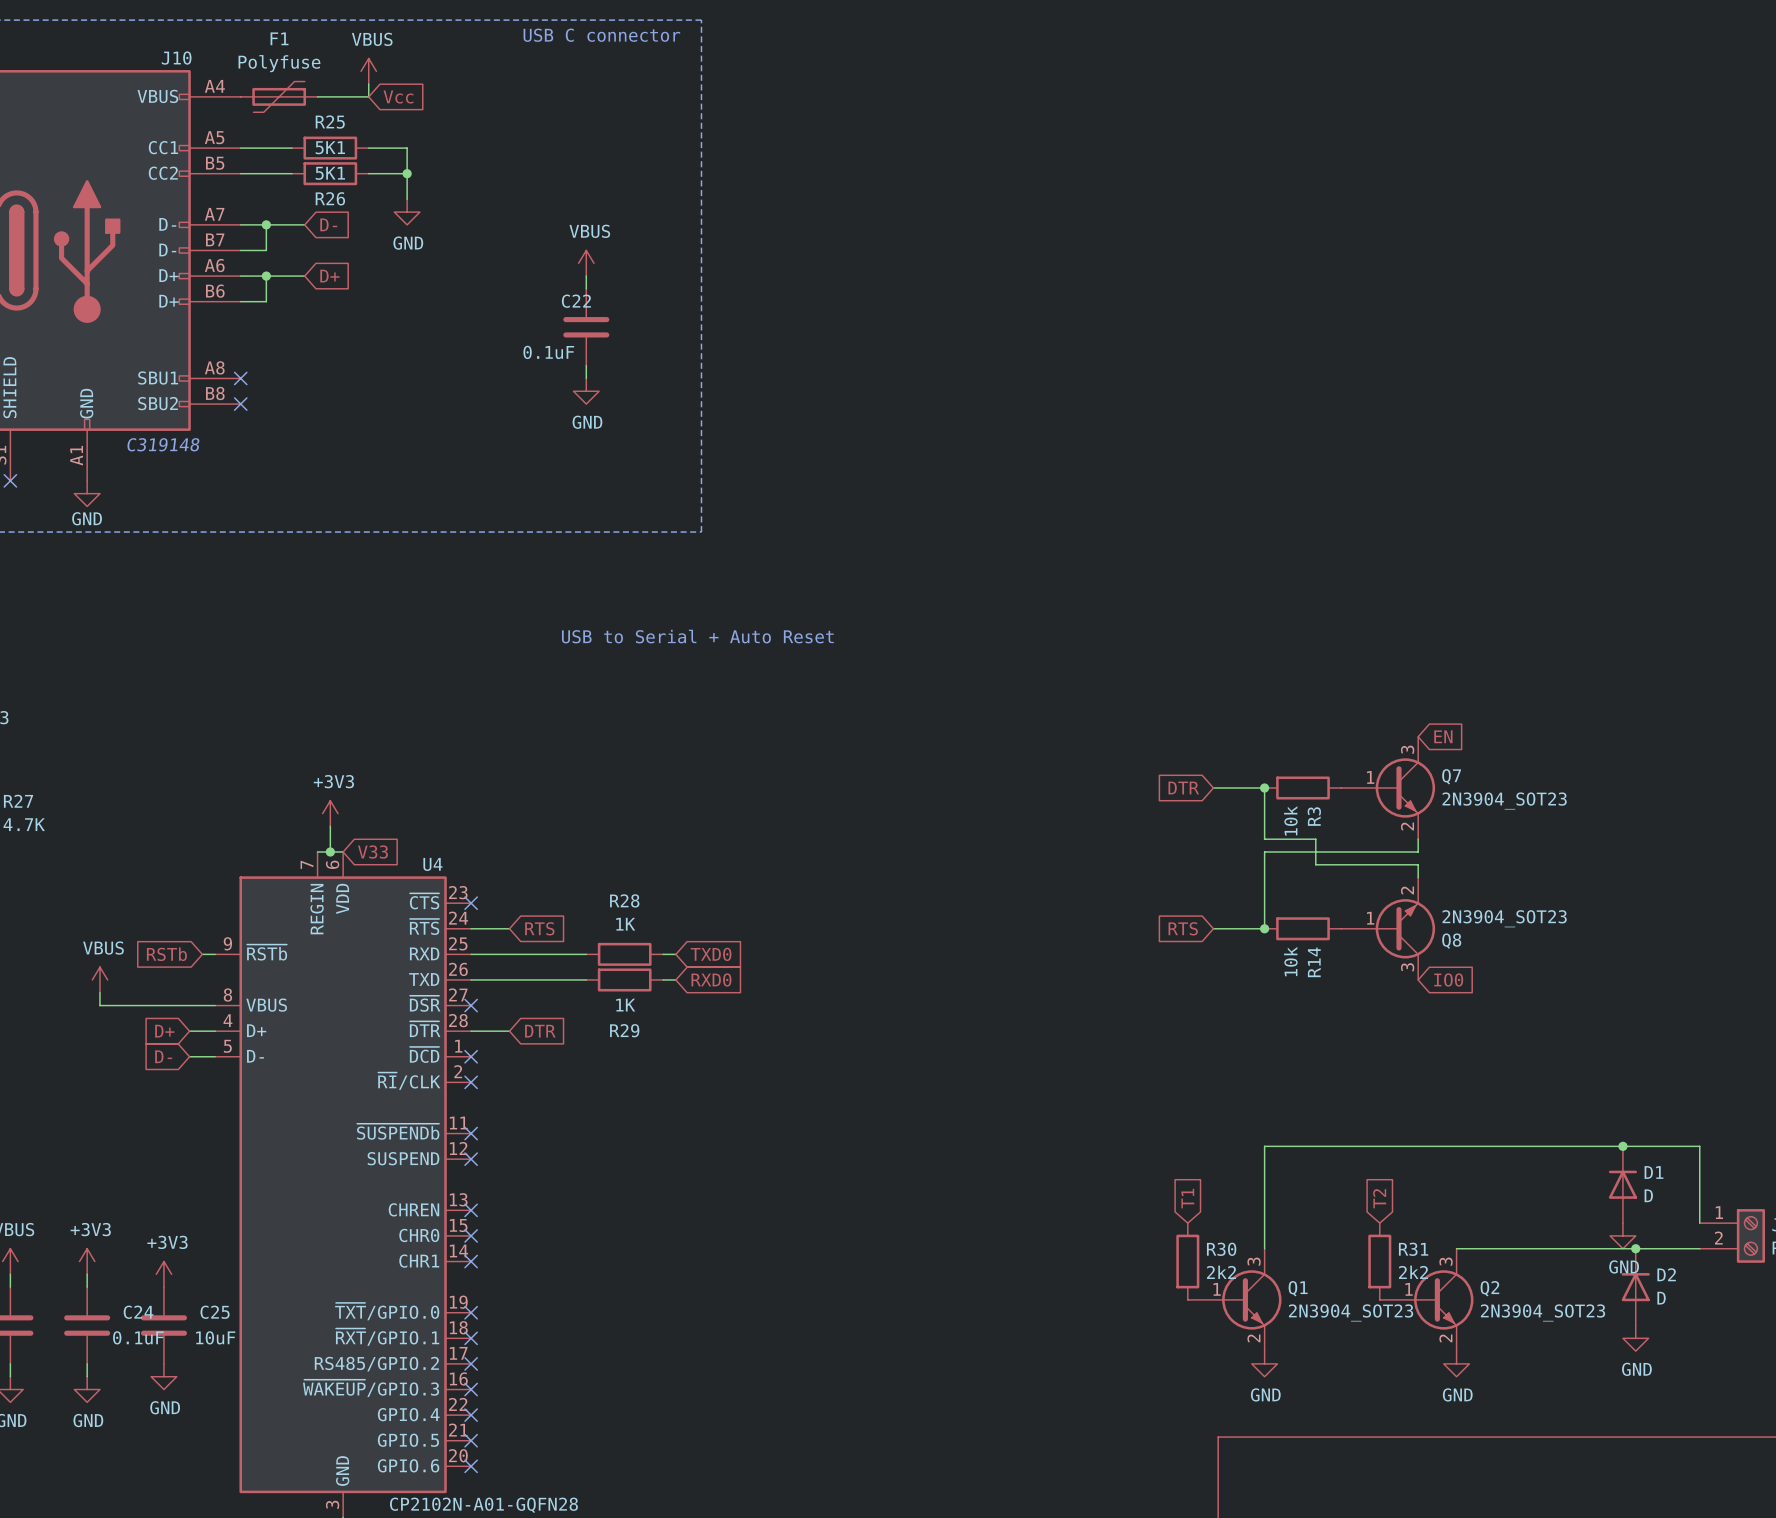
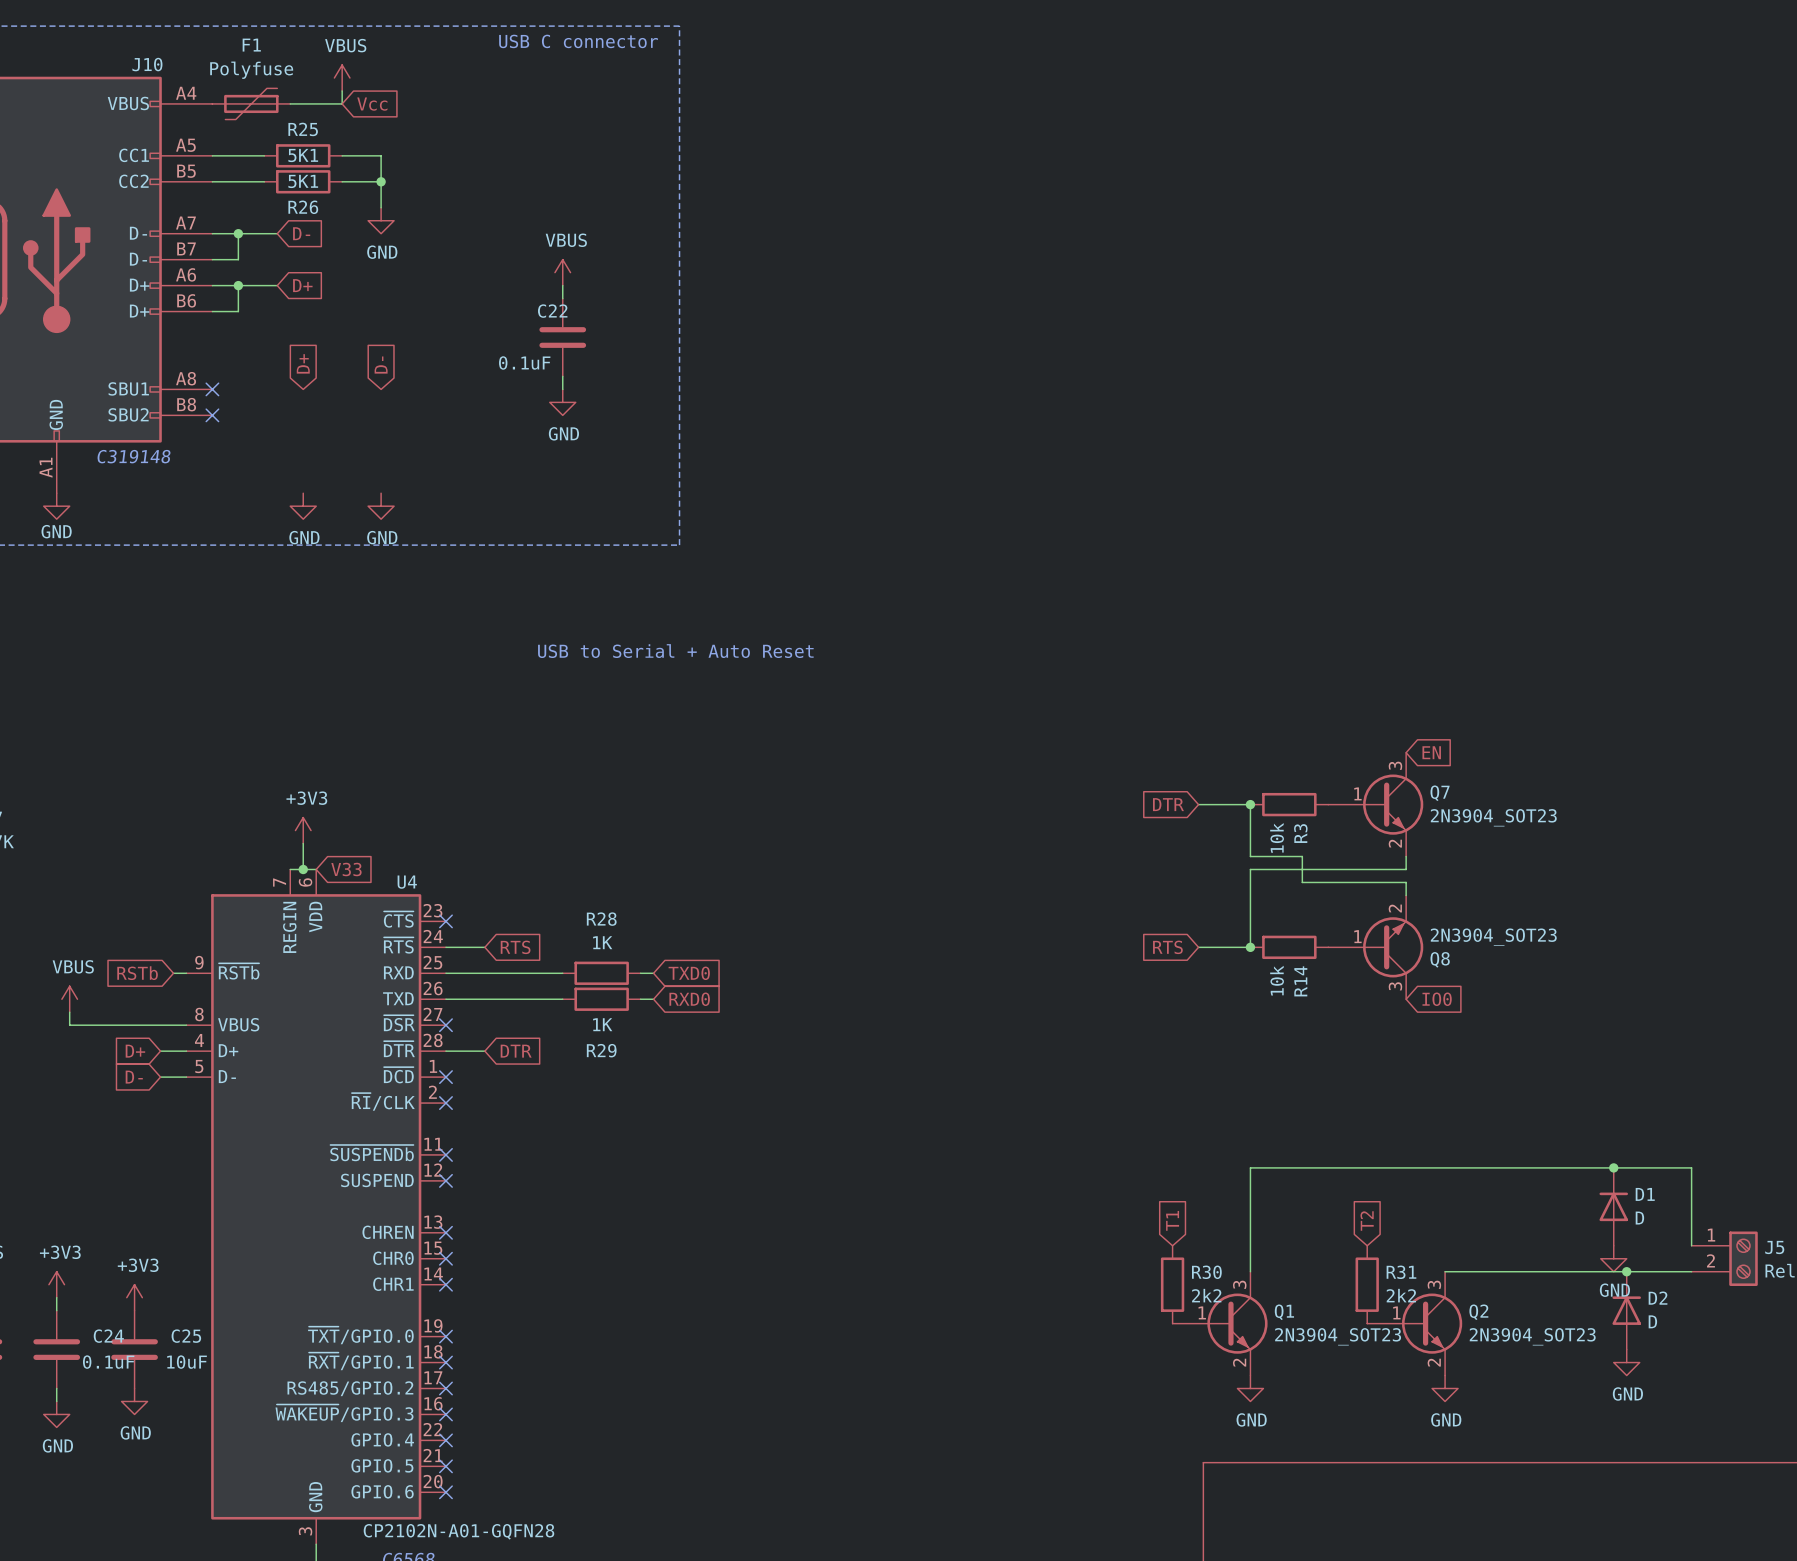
global label: none -> D+ (303, 363)
global label: none -> D- (381, 365)
power symbol: none -> GND (303, 506)
power symbol: none -> GND (381, 506)

